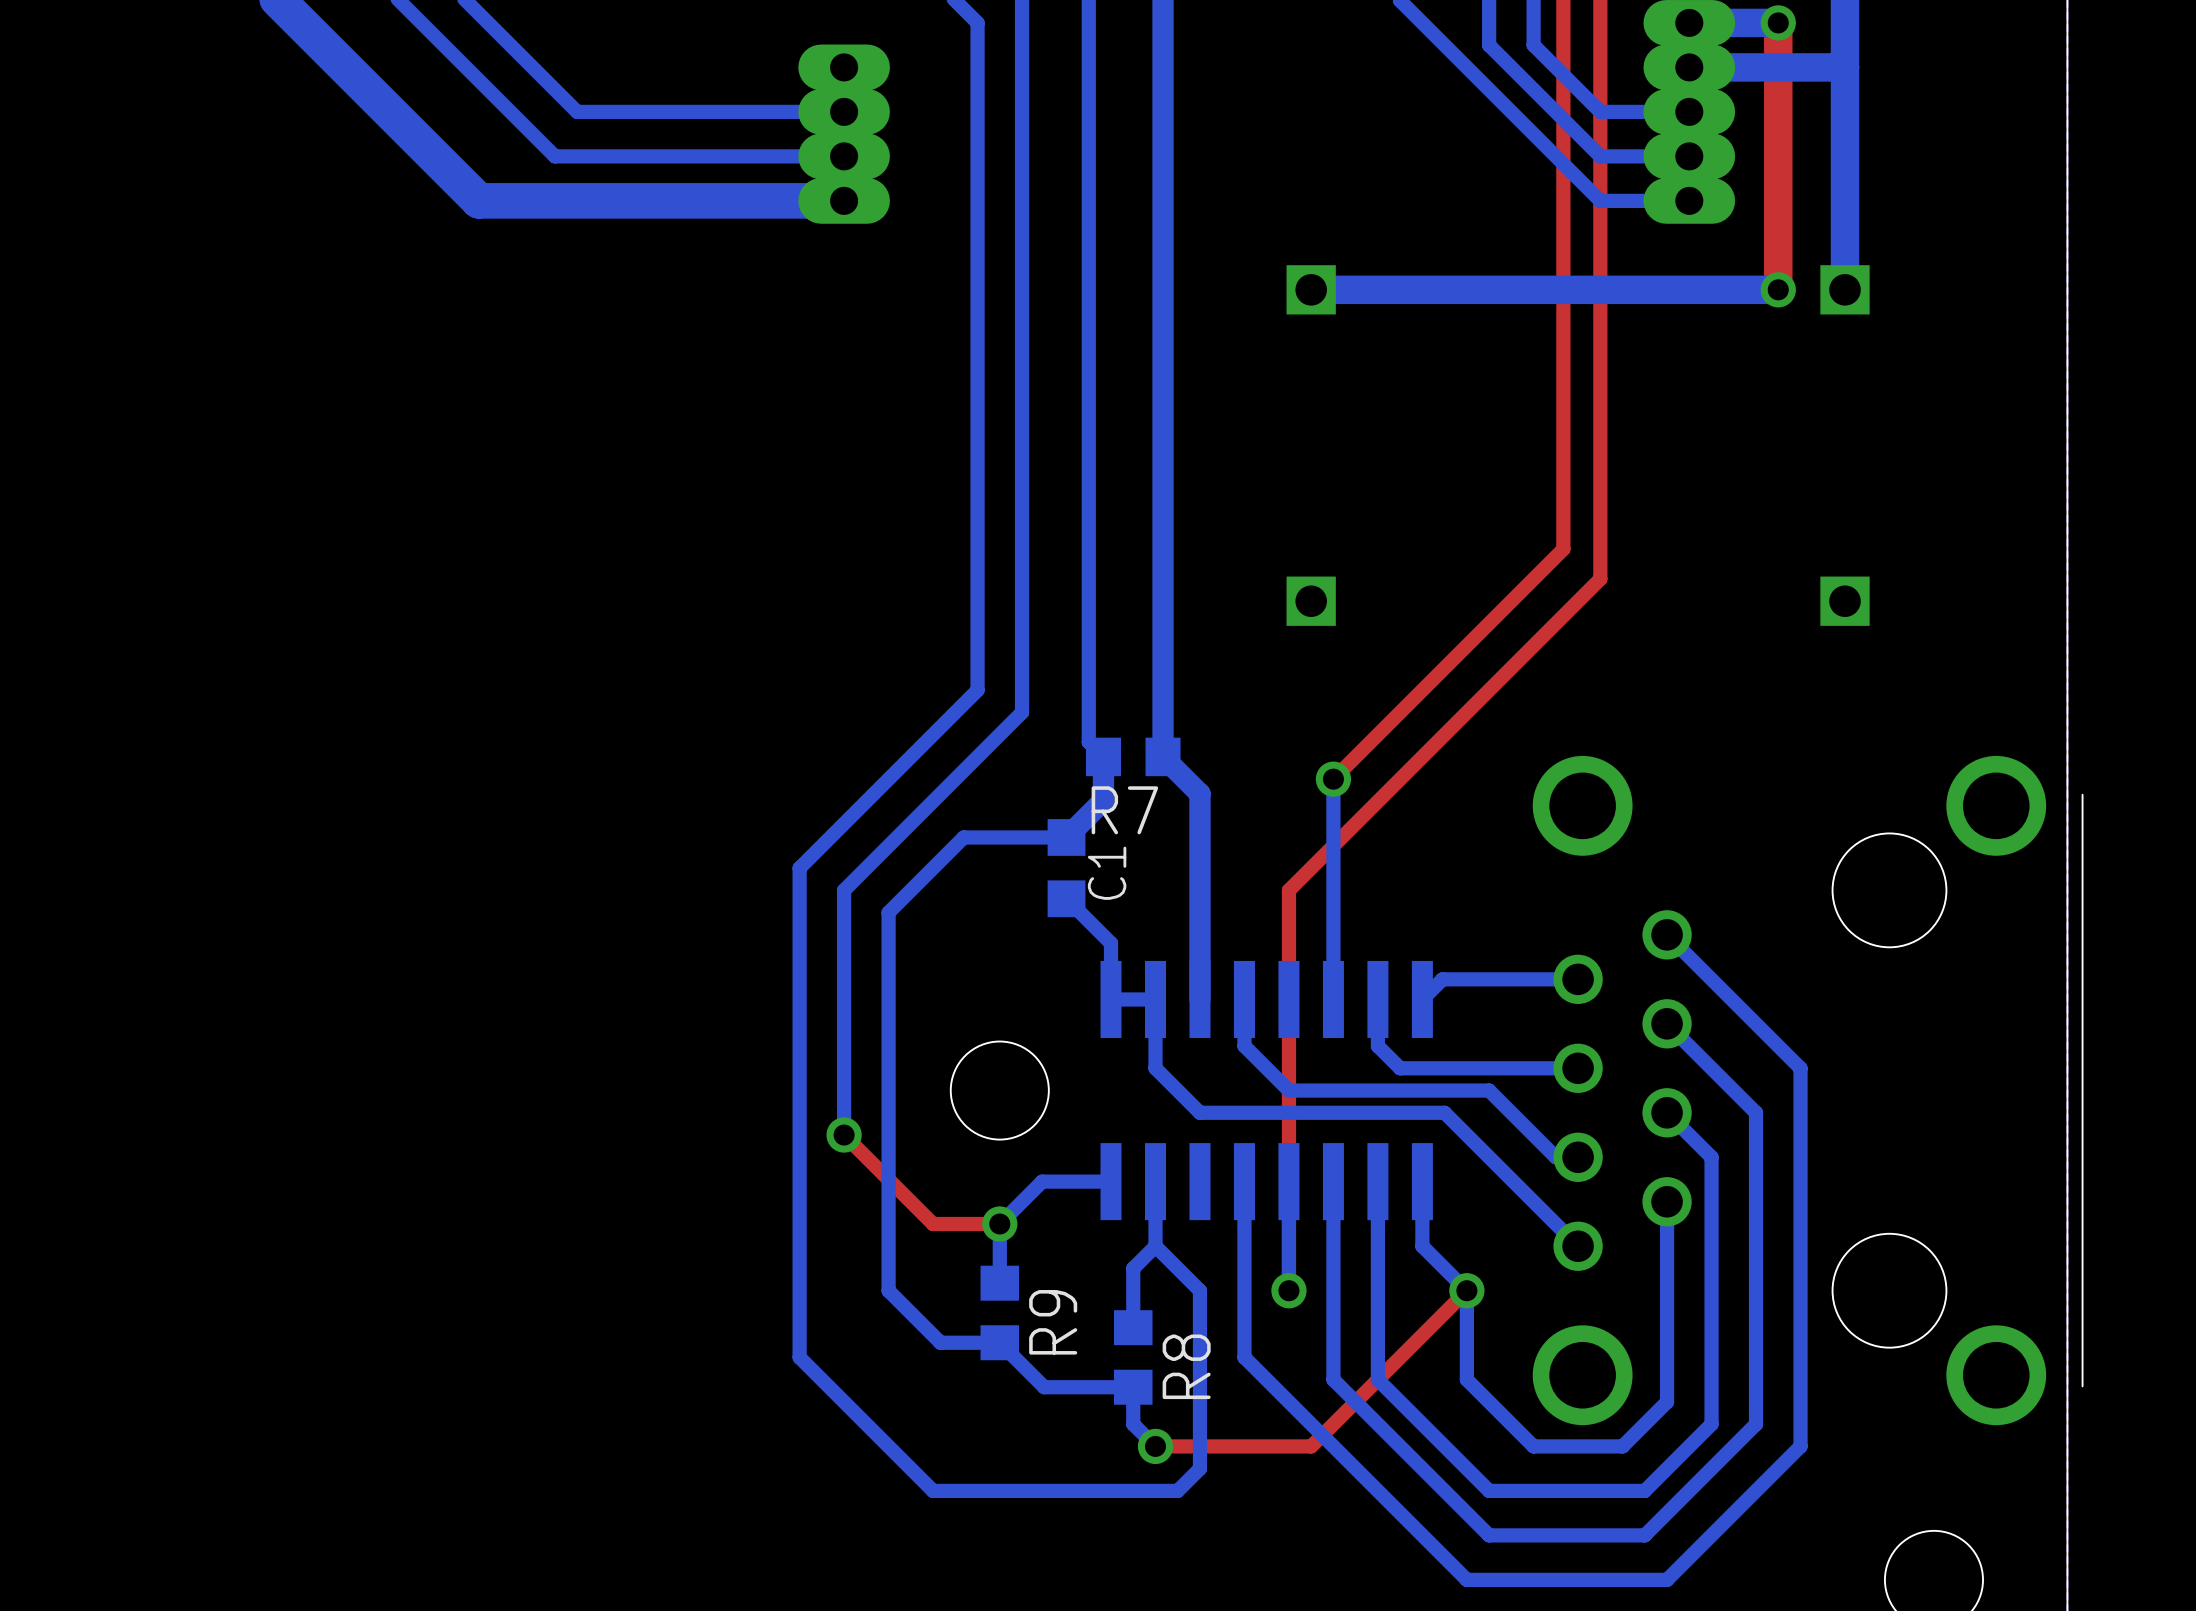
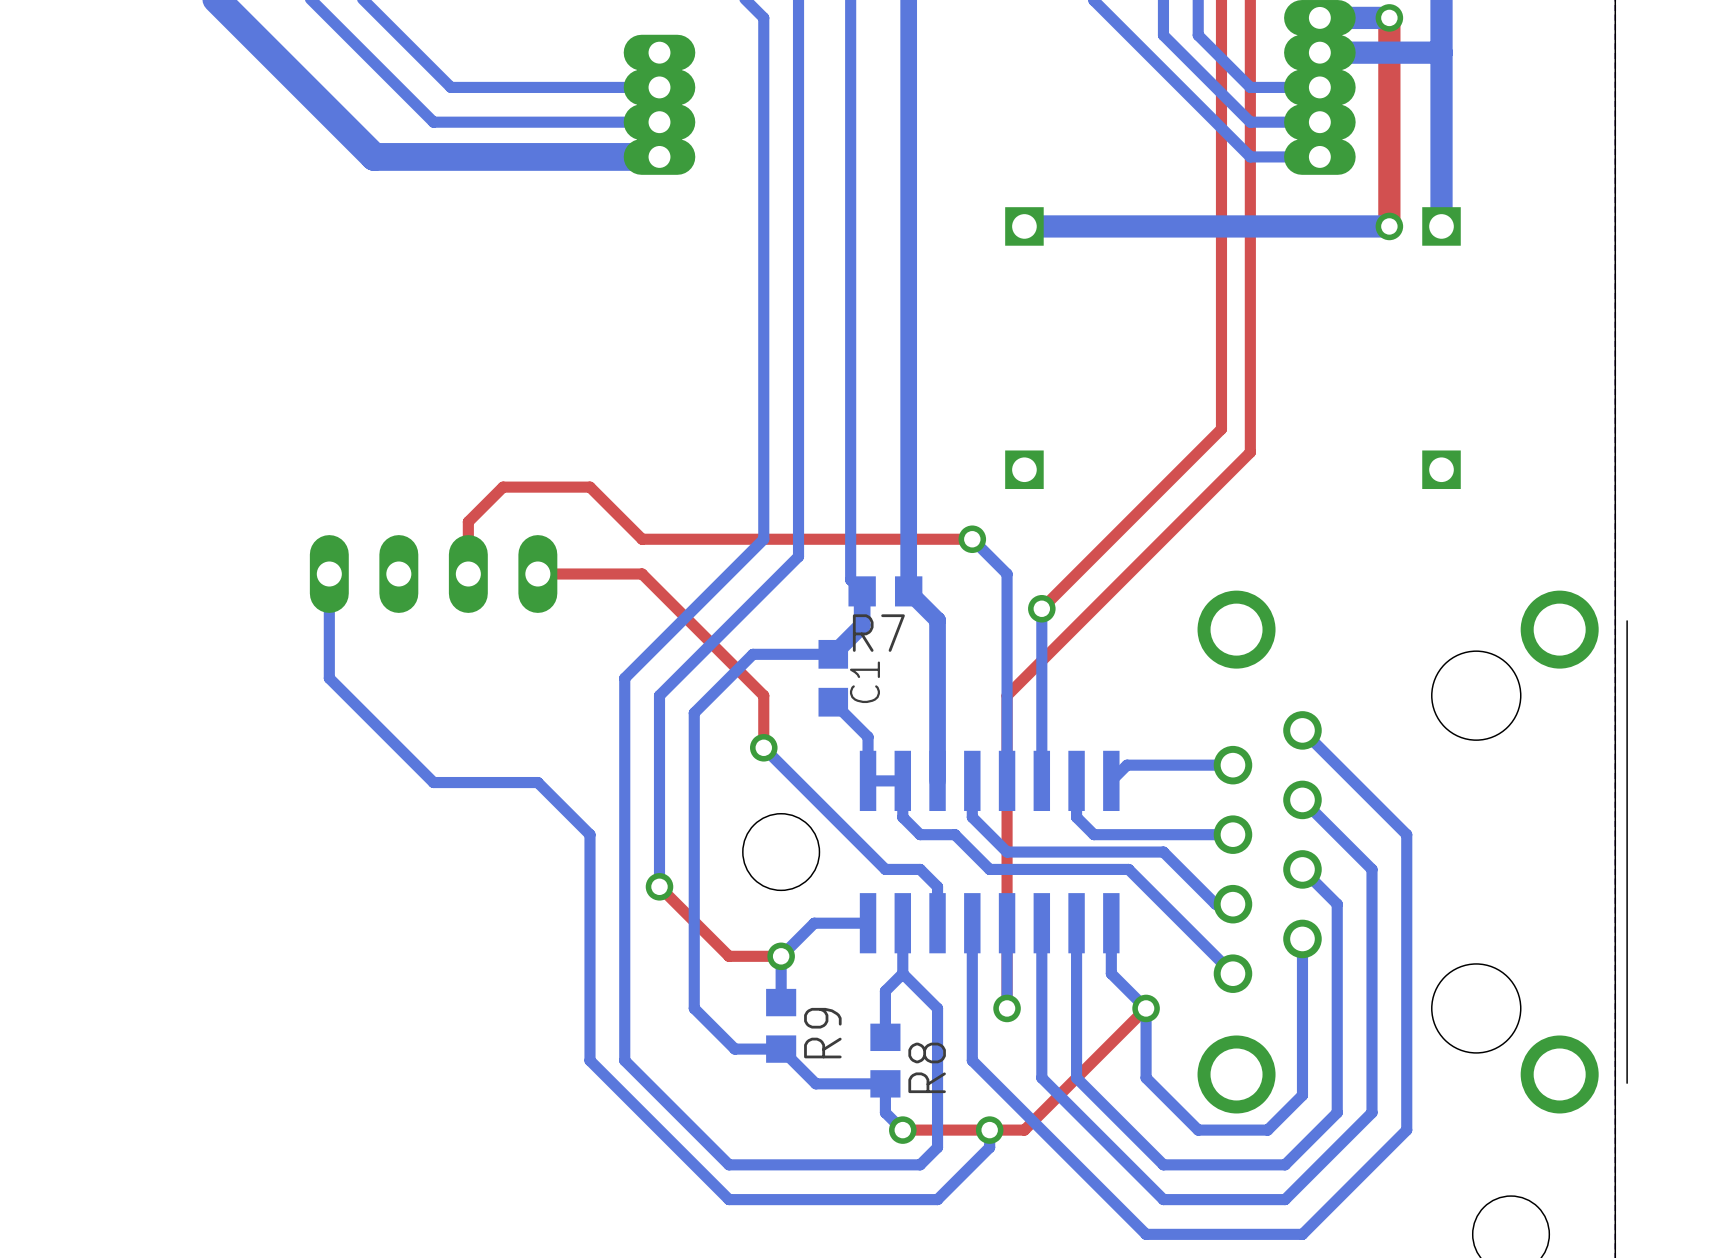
bottom track: none -> (972, 539) (1007, 574) (1007, 780)
top track: none -> (972, 539) (642, 539) (589, 487) (503, 487) (468, 521) (468, 574)
via: none -> (972, 539)
bottom track: none -> (329, 574) (329, 678) (433, 782) (537, 782) (589, 834) (589, 1060) (729, 1199) (937, 1199) (989, 1147) (989, 1130)
part: none -> (433, 574)
top track: none -> (537, 574) (642, 574) (763, 695) (763, 747)
bottom track: none -> (763, 747) (885, 869) (920, 869) (937, 886) (937, 923)
via: none -> (763, 747)
bottom track: (1155, 1046) (1155, 1068) (1199, 1112) (1266, 1112) -> (902, 817) (920, 834) (954, 834) (989, 869)
via: none -> (989, 1130)

